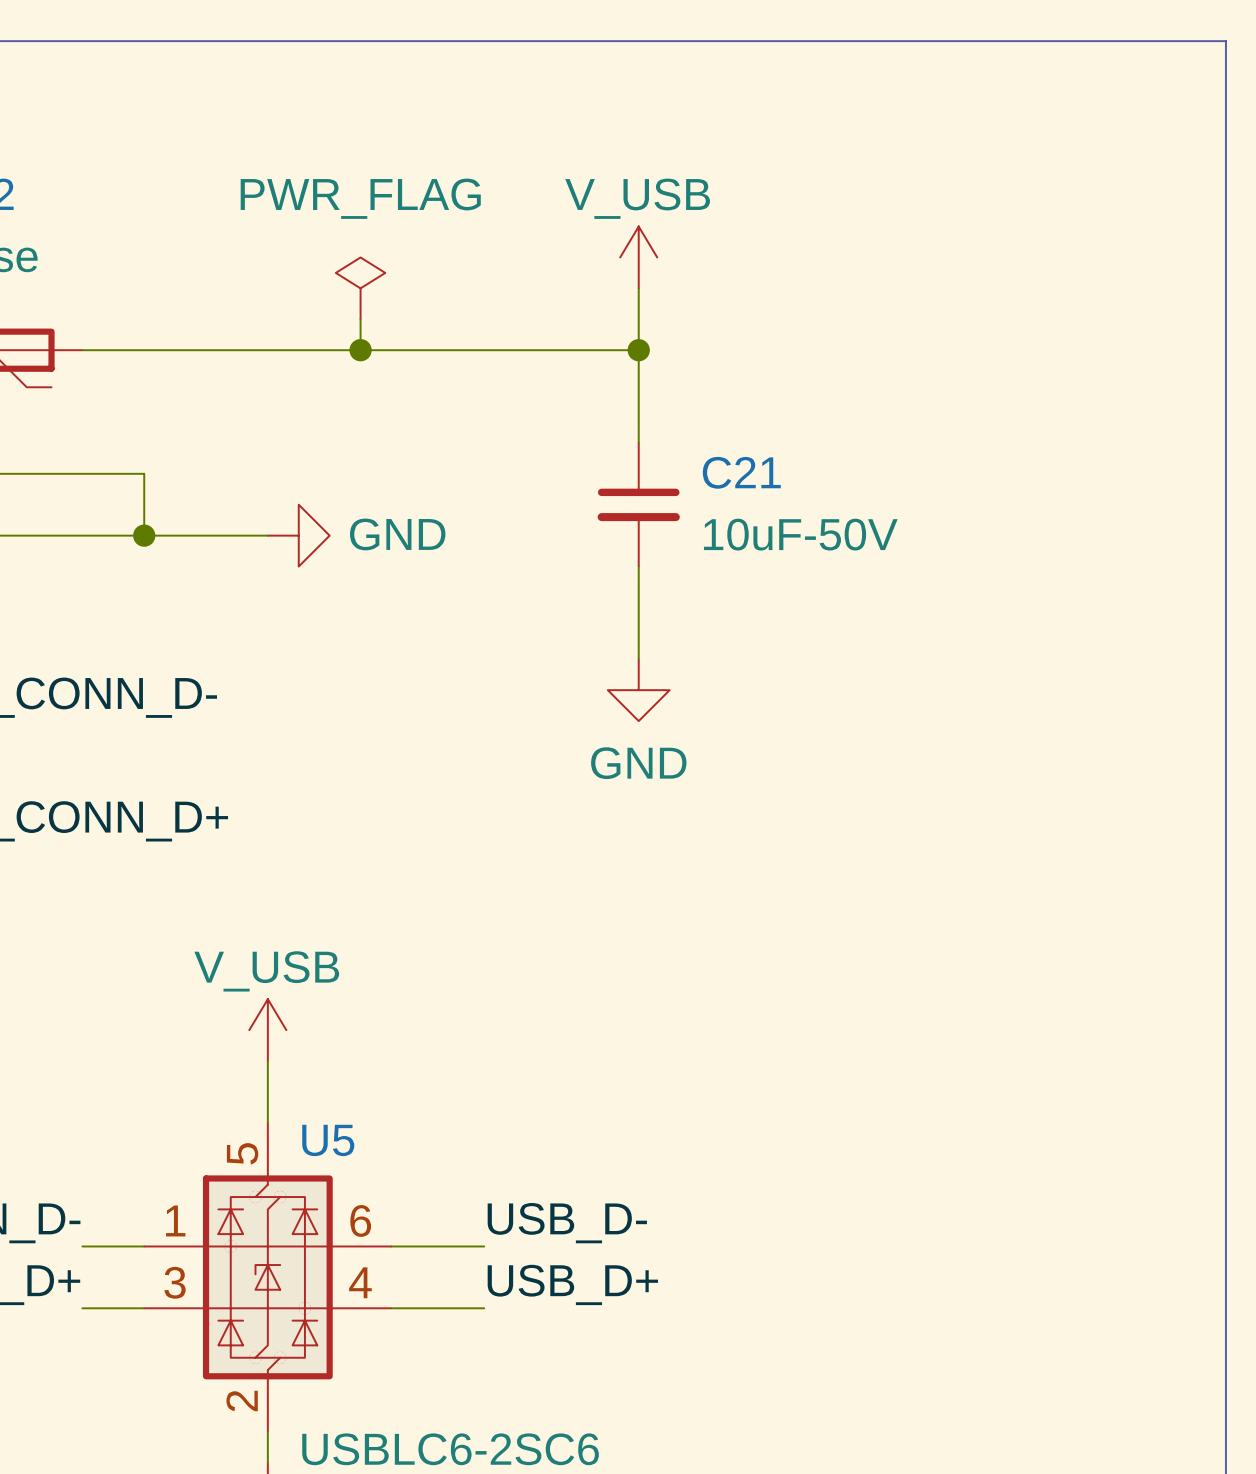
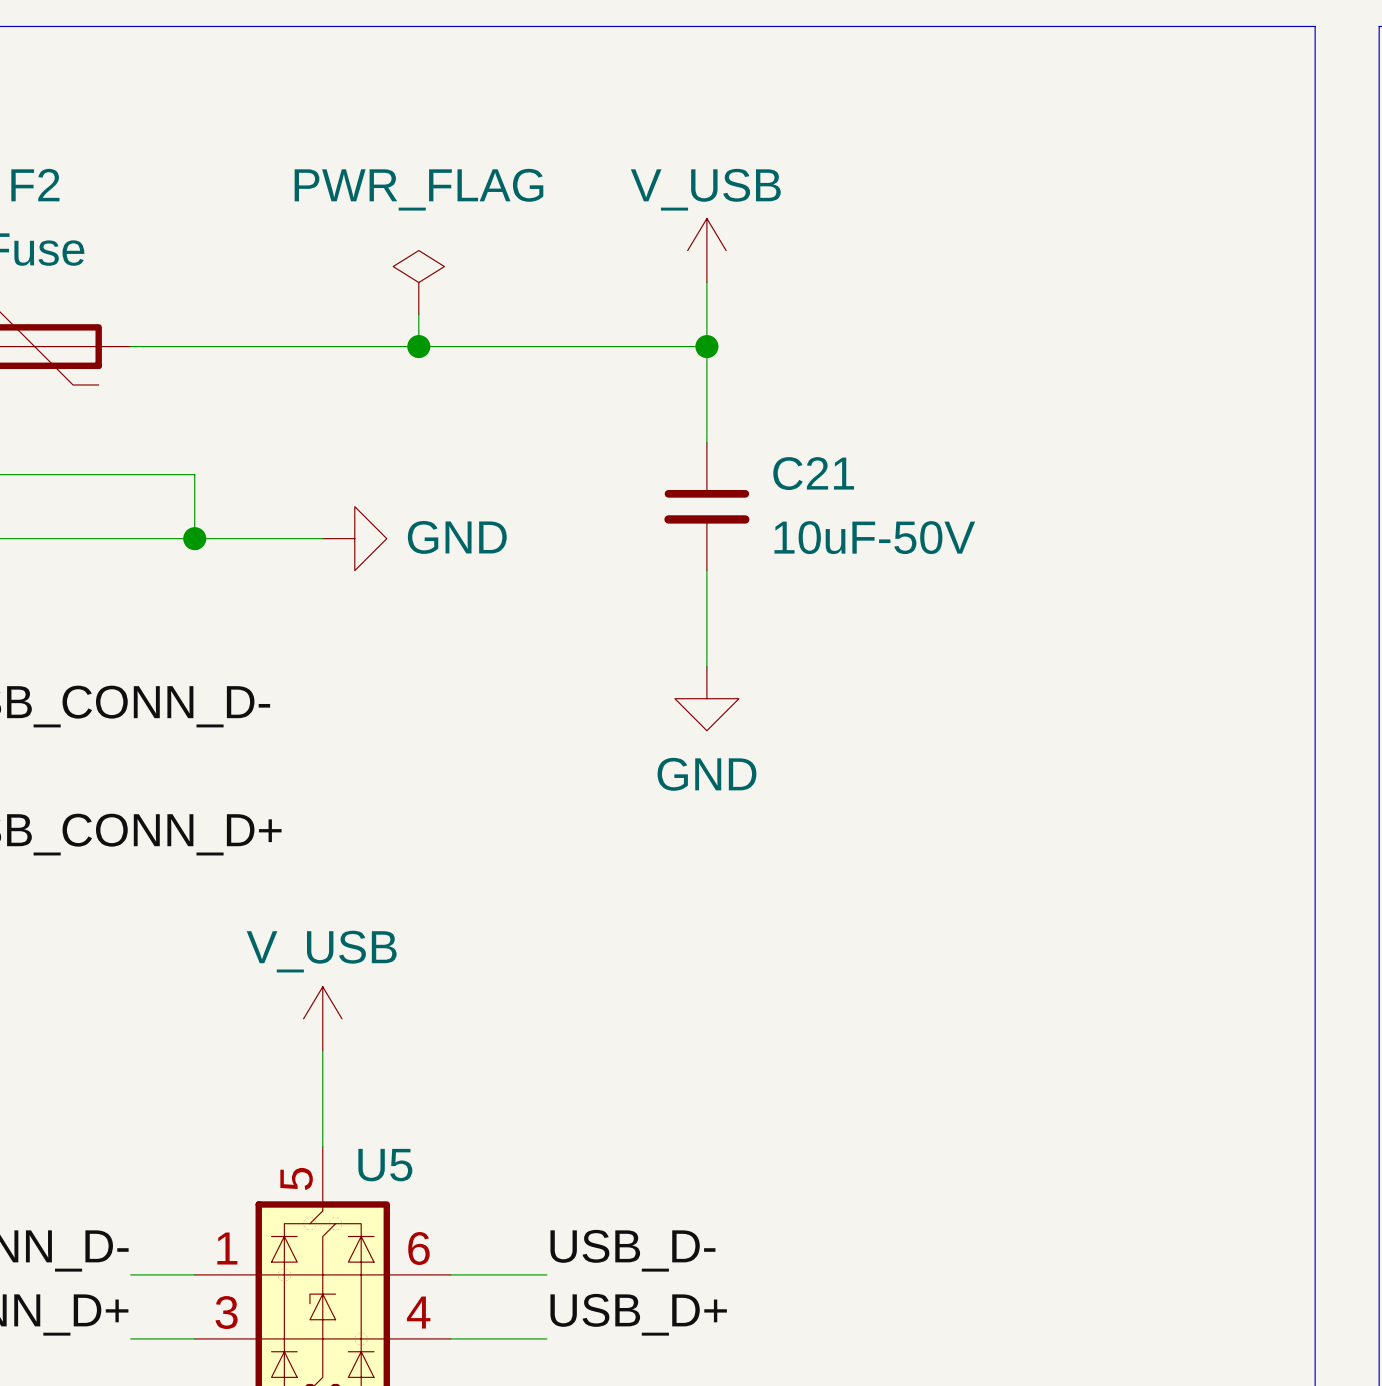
power symbol text position: V_USB (266, 971) -> V_USB (321, 951)
power symbol position: V_USB (267, 1030) -> V_USB (322, 1018)

